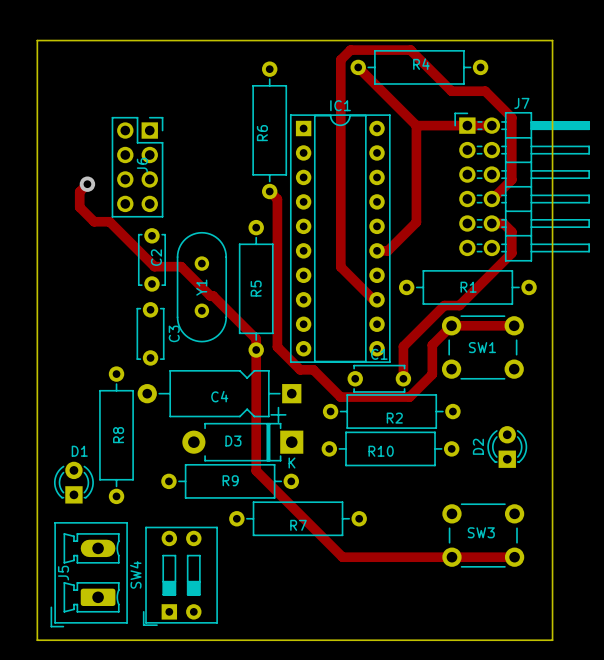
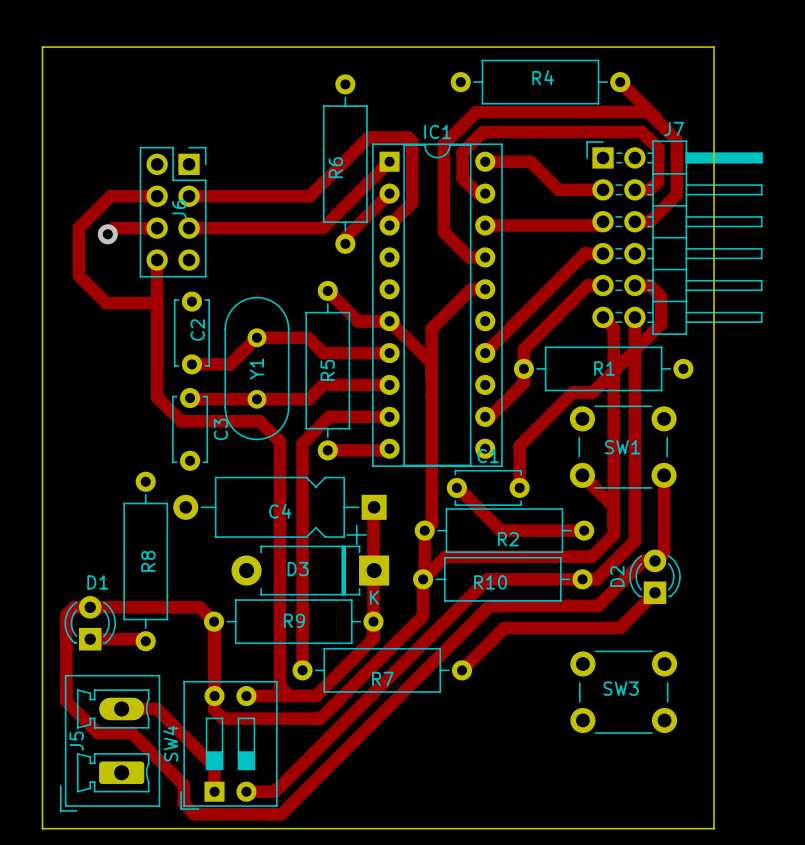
track: (358, 67) (416, 125) -> none
track: none -> (620, 82) (655, 118)
track: (416, 125) (491, 125) -> none
track: (416, 125) (416, 222) (387, 250) (377, 250) -> none
track: none -> (389, 161) (323, 228) (189, 228)
track: none -> (485, 161) (530, 161) (558, 189) (603, 189)
track: none -> (634, 189) (650, 189) (658, 181) (658, 148) (641, 131) (483, 131) (462, 152) (462, 178) (477, 193) (485, 193)
track: none -> (157, 196) (110, 196) (78, 228) (78, 275) (106, 303) (157, 303)
track: none -> (189, 196) (309, 196) (368, 137) (408, 137) (412, 141) (412, 202) (389, 225)
track: none -> (603, 221) (599, 225) (485, 225)
track: none -> (634, 221) (650, 221) (676, 194) (676, 140) (648, 112) (476, 112) (443, 144) (443, 231) (469, 257) (485, 257)
track: (87, 184) (79, 191) (79, 207) (94, 221) (109, 221) (154, 266) (181, 266) (256, 339) (256, 470) (342, 557) (514, 557) -> (107, 234) (113, 228) (157, 228)
track: (269, 191) (277, 199) (277, 347) (300, 369) (313, 369) (340, 397) (409, 397) (432, 374) (432, 345) (451, 325) (514, 325) -> (345, 243) (345, 237) (389, 193)
track: none -> (603, 253) (584, 253) (485, 353)
track: (491, 199) (511, 179) (511, 117) (485, 91) (451, 91) (410, 50) (350, 50) (340, 59) (340, 267) (373, 299) (377, 299) -> none
track: none -> (157, 260) (157, 397) (181, 421) (259, 421) (279, 441) (279, 686) (289, 696)
track: none -> (603, 285) (587, 285) (523, 349) (523, 383) (490, 416) (485, 416)
track: none -> (485, 289) (471, 289) (431, 328) (431, 523) (424, 530) (424, 577)
track: none -> (327, 290) (358, 321) (389, 321) (431, 363)
track: none -> (603, 317) (613, 328) (613, 534) (591, 556) (445, 556) (423, 579) (423, 615) (320, 718) (222, 718) (214, 710) (214, 631)
track: none -> (634, 317) (634, 540) (596, 579) (487, 579) (275, 791) (246, 791)
track: none -> (389, 353) (323, 353) (307, 337) (256, 337) (230, 364) (191, 364)
track: none -> (389, 384) (323, 384) (308, 399) (190, 398)
track: none -> (389, 416) (329, 416) (302, 443) (302, 670)
track: none -> (389, 448) (387, 450) (327, 450)
track: none -> (582, 475) (613, 506)
track: none -> (664, 475) (664, 552) (654, 560) (643, 560) (598, 605) (489, 605) (281, 814) (194, 814) (183, 803) (183, 785) (131, 732) (97, 732) (66, 701) (66, 615) (74, 607) (199, 607) (214, 621) (214, 675)
track: none -> (456, 486) (500, 530) (584, 530)
track: none -> (374, 516) (373, 638) (316, 696) (246, 696)
track: none -> (654, 593) (620, 627) (504, 627) (462, 670)
track: none -> (90, 639) (143, 639) (145, 641)
track: none -> (121, 708) (156, 708) (214, 766) (214, 791)

